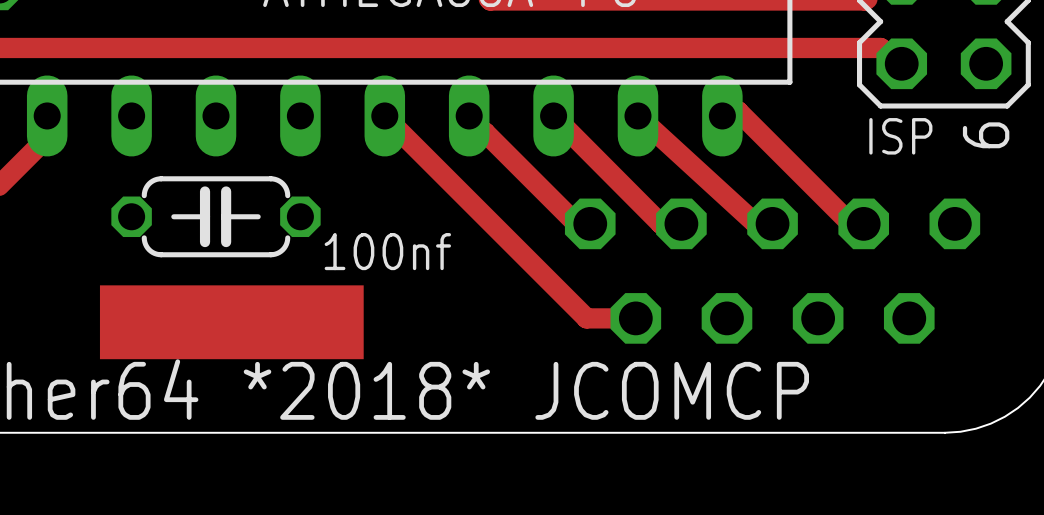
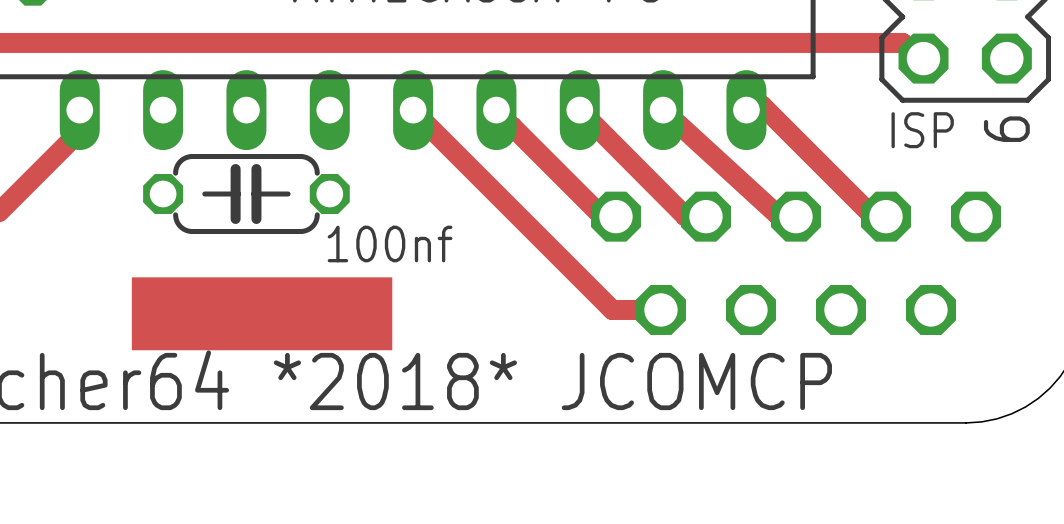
part position: (216, 216) -> (246, 194)
part value position: 100nf (387, 251) -> 100nf (390, 244)

